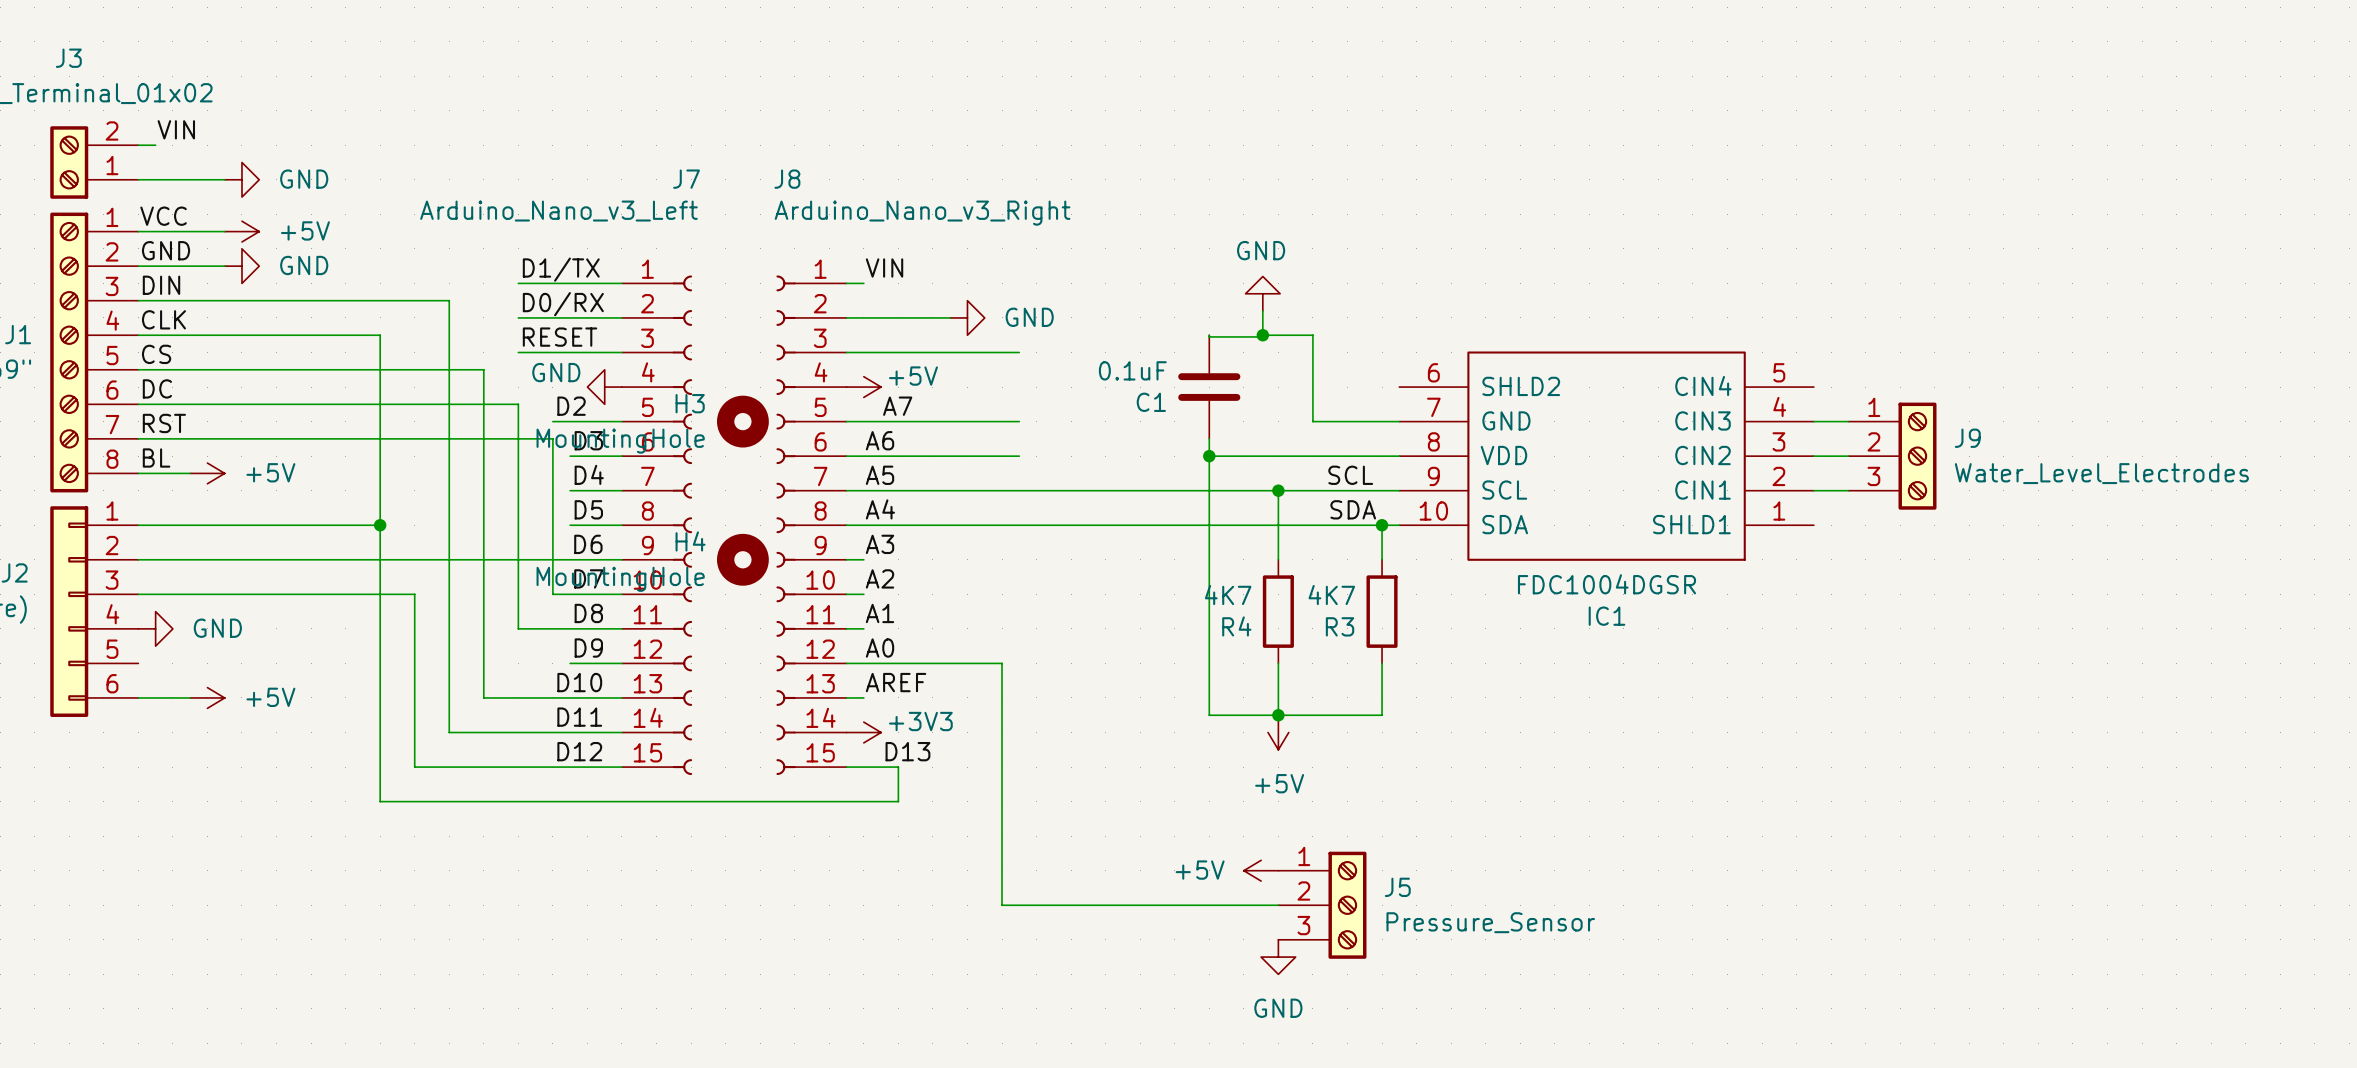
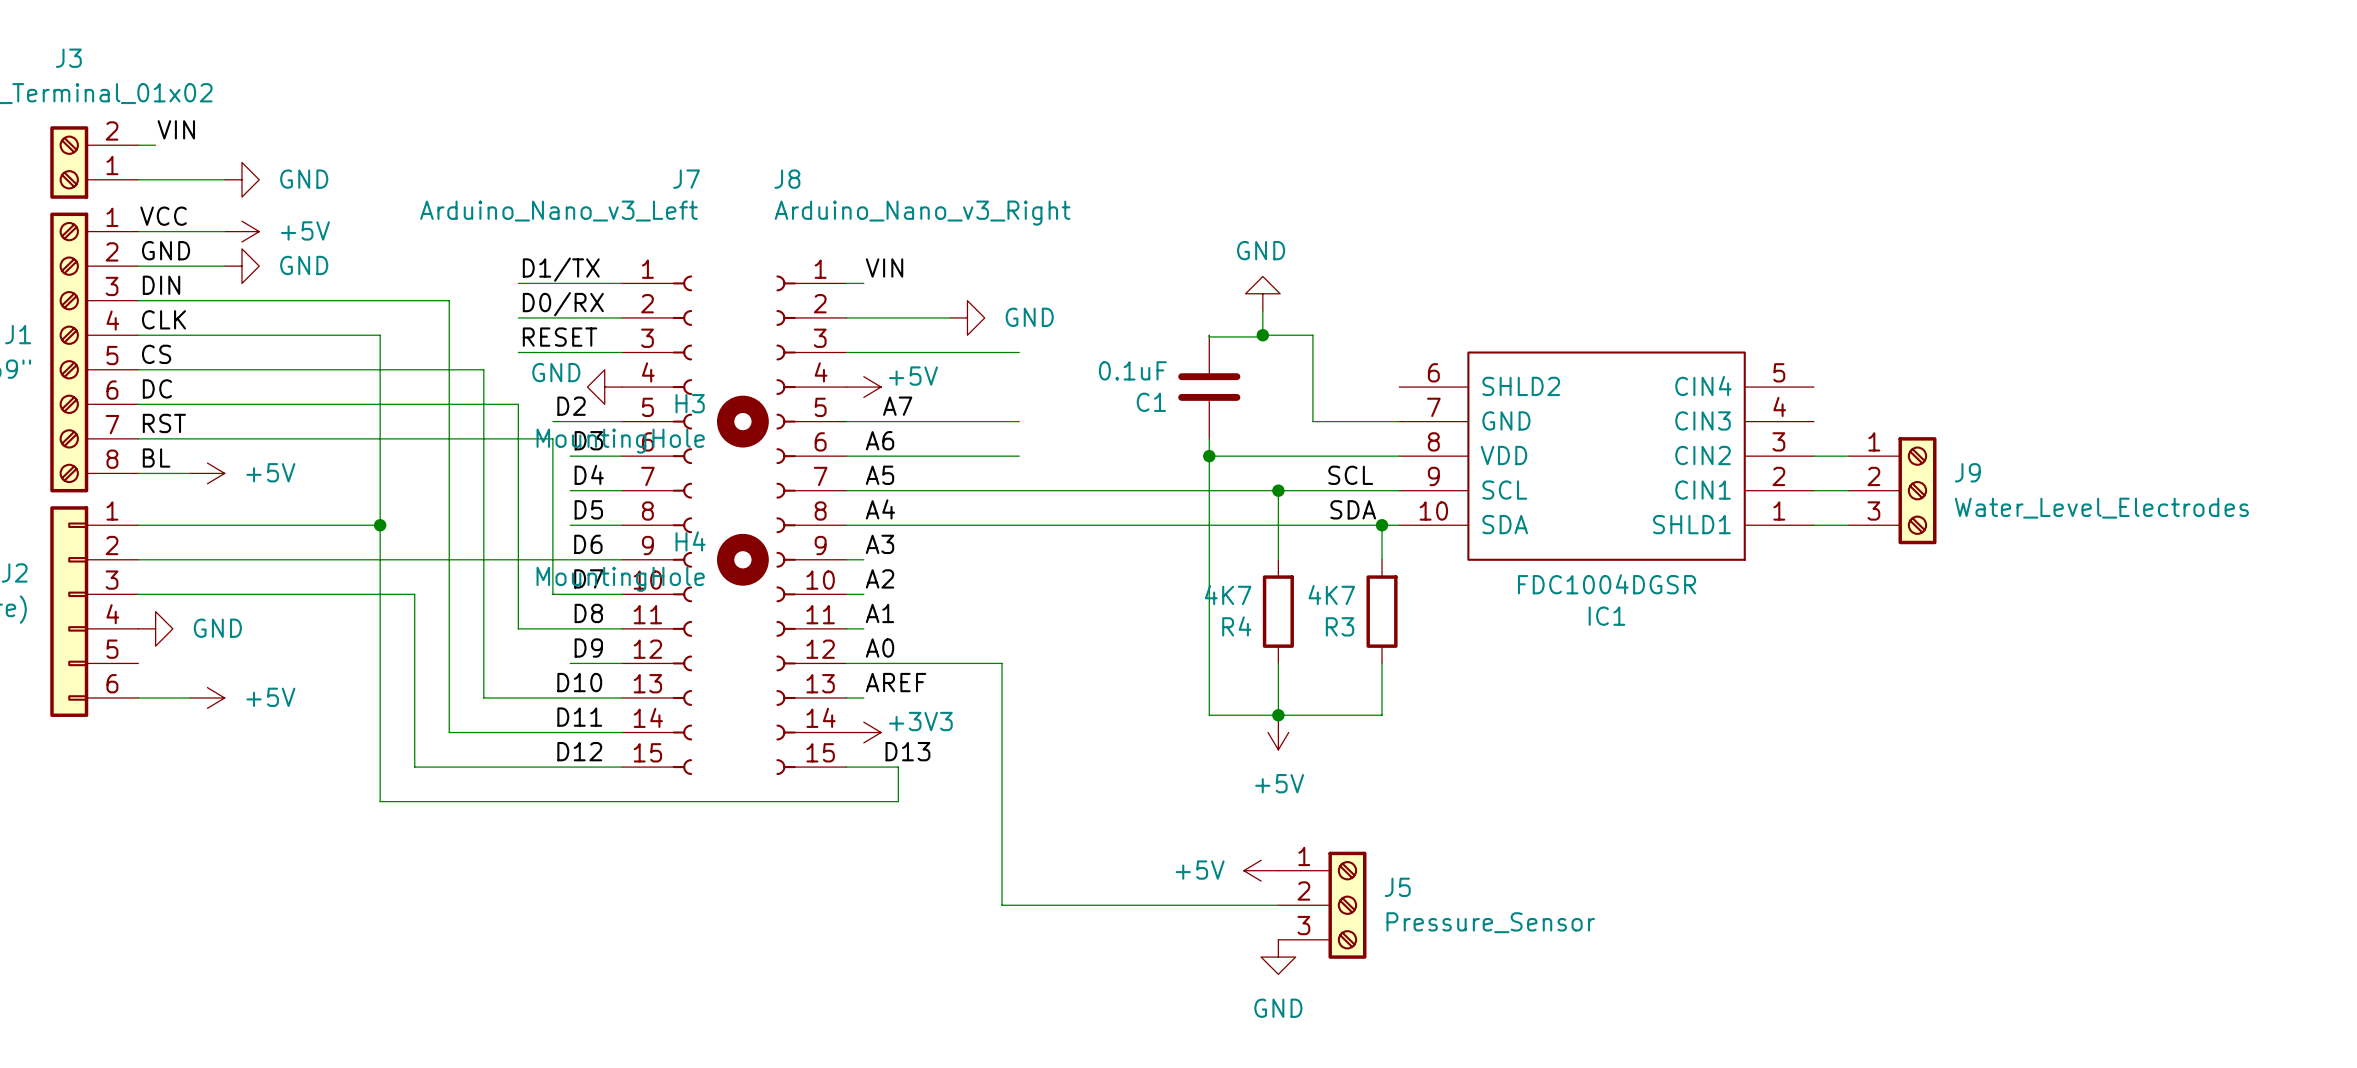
wire: (1813, 421) (1848, 421) -> (1813, 525) (1848, 525)
J9 position: (1892, 456) -> (1892, 490)

